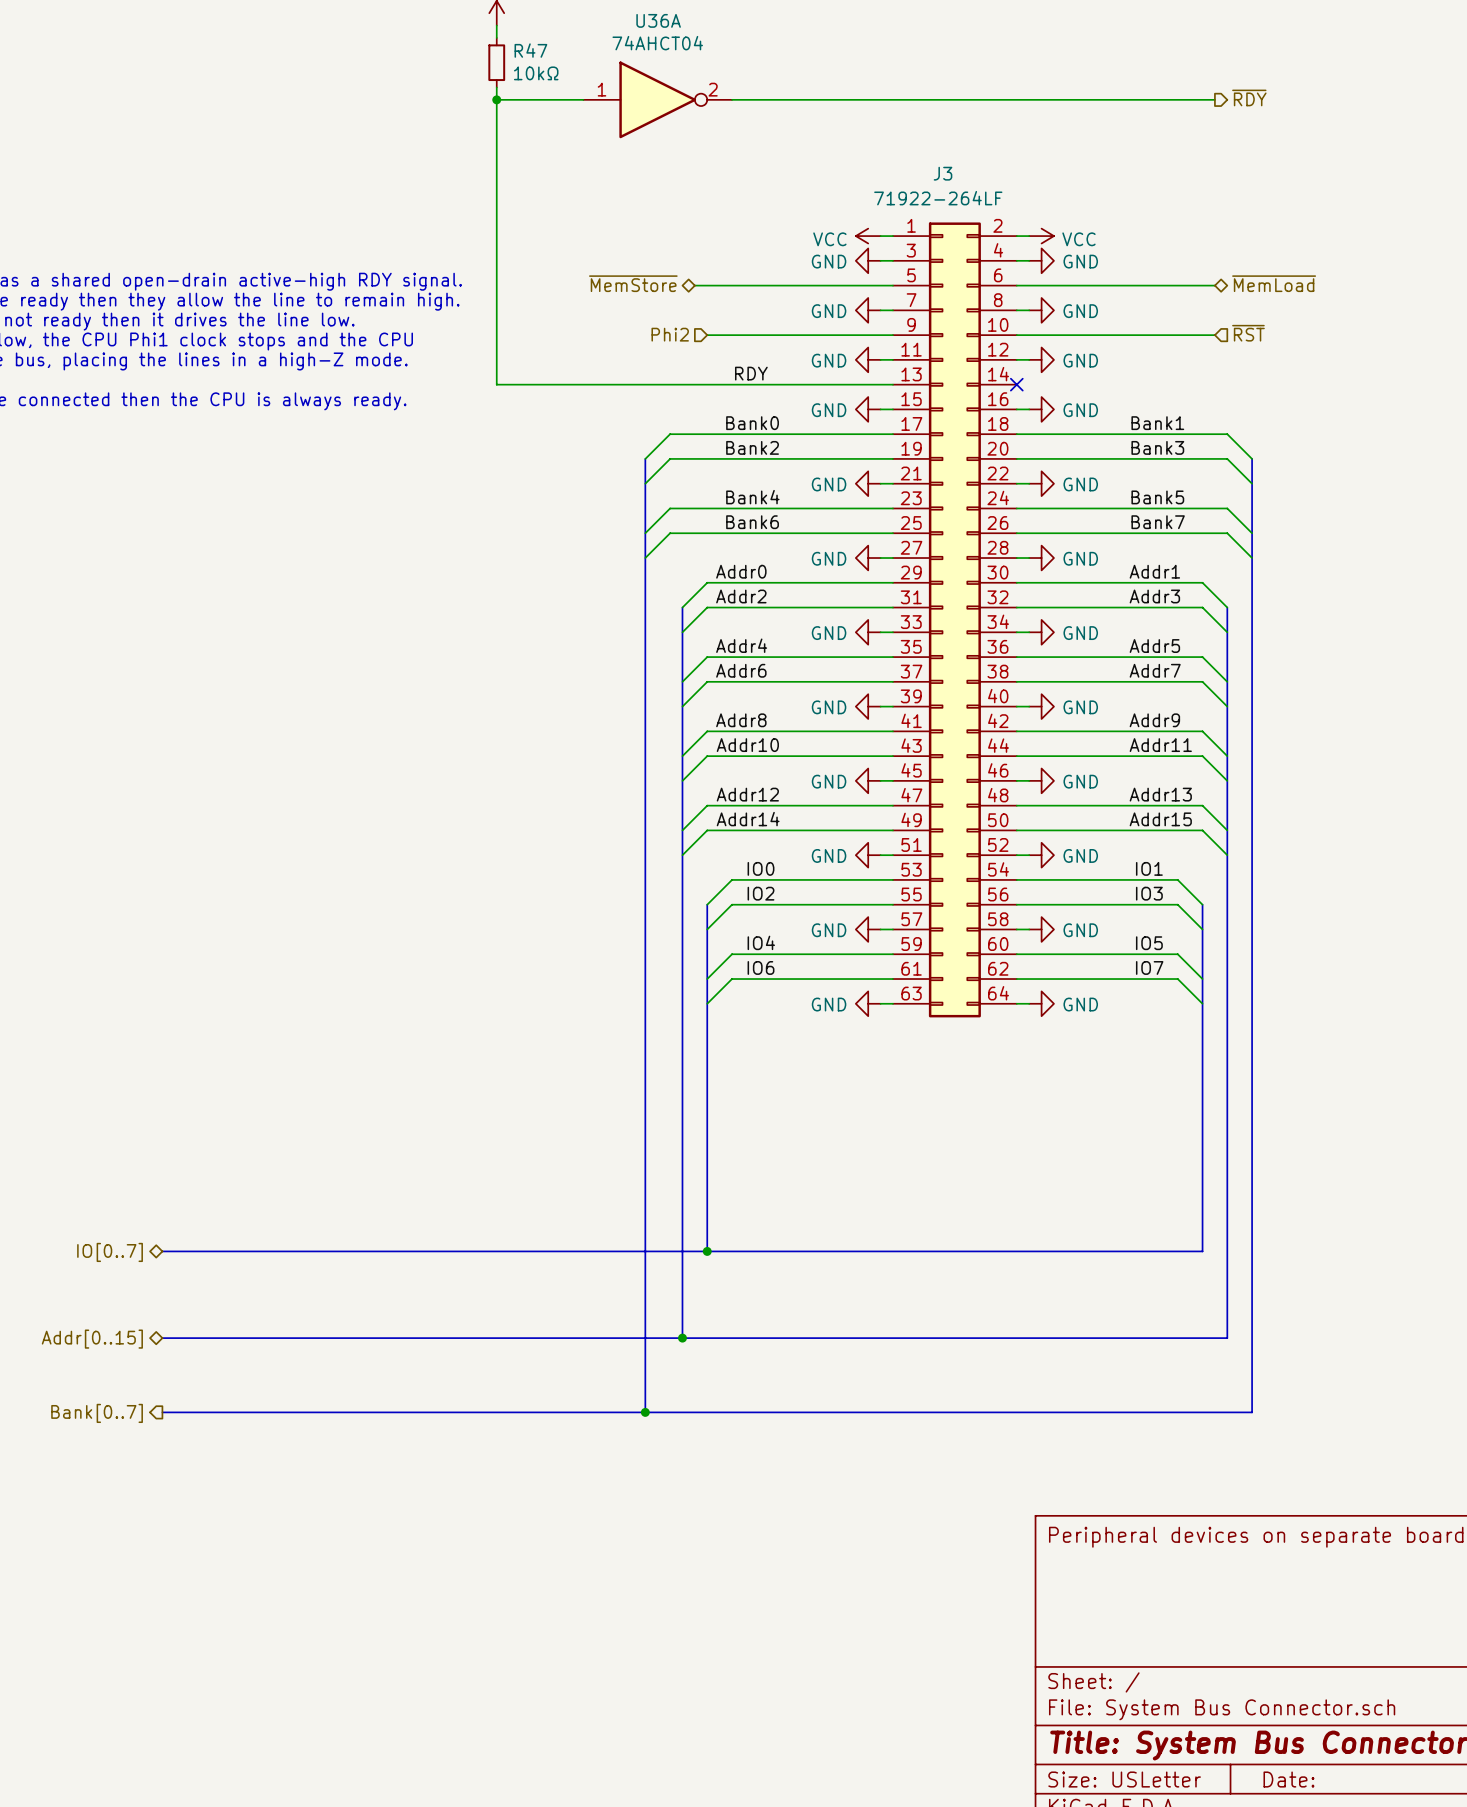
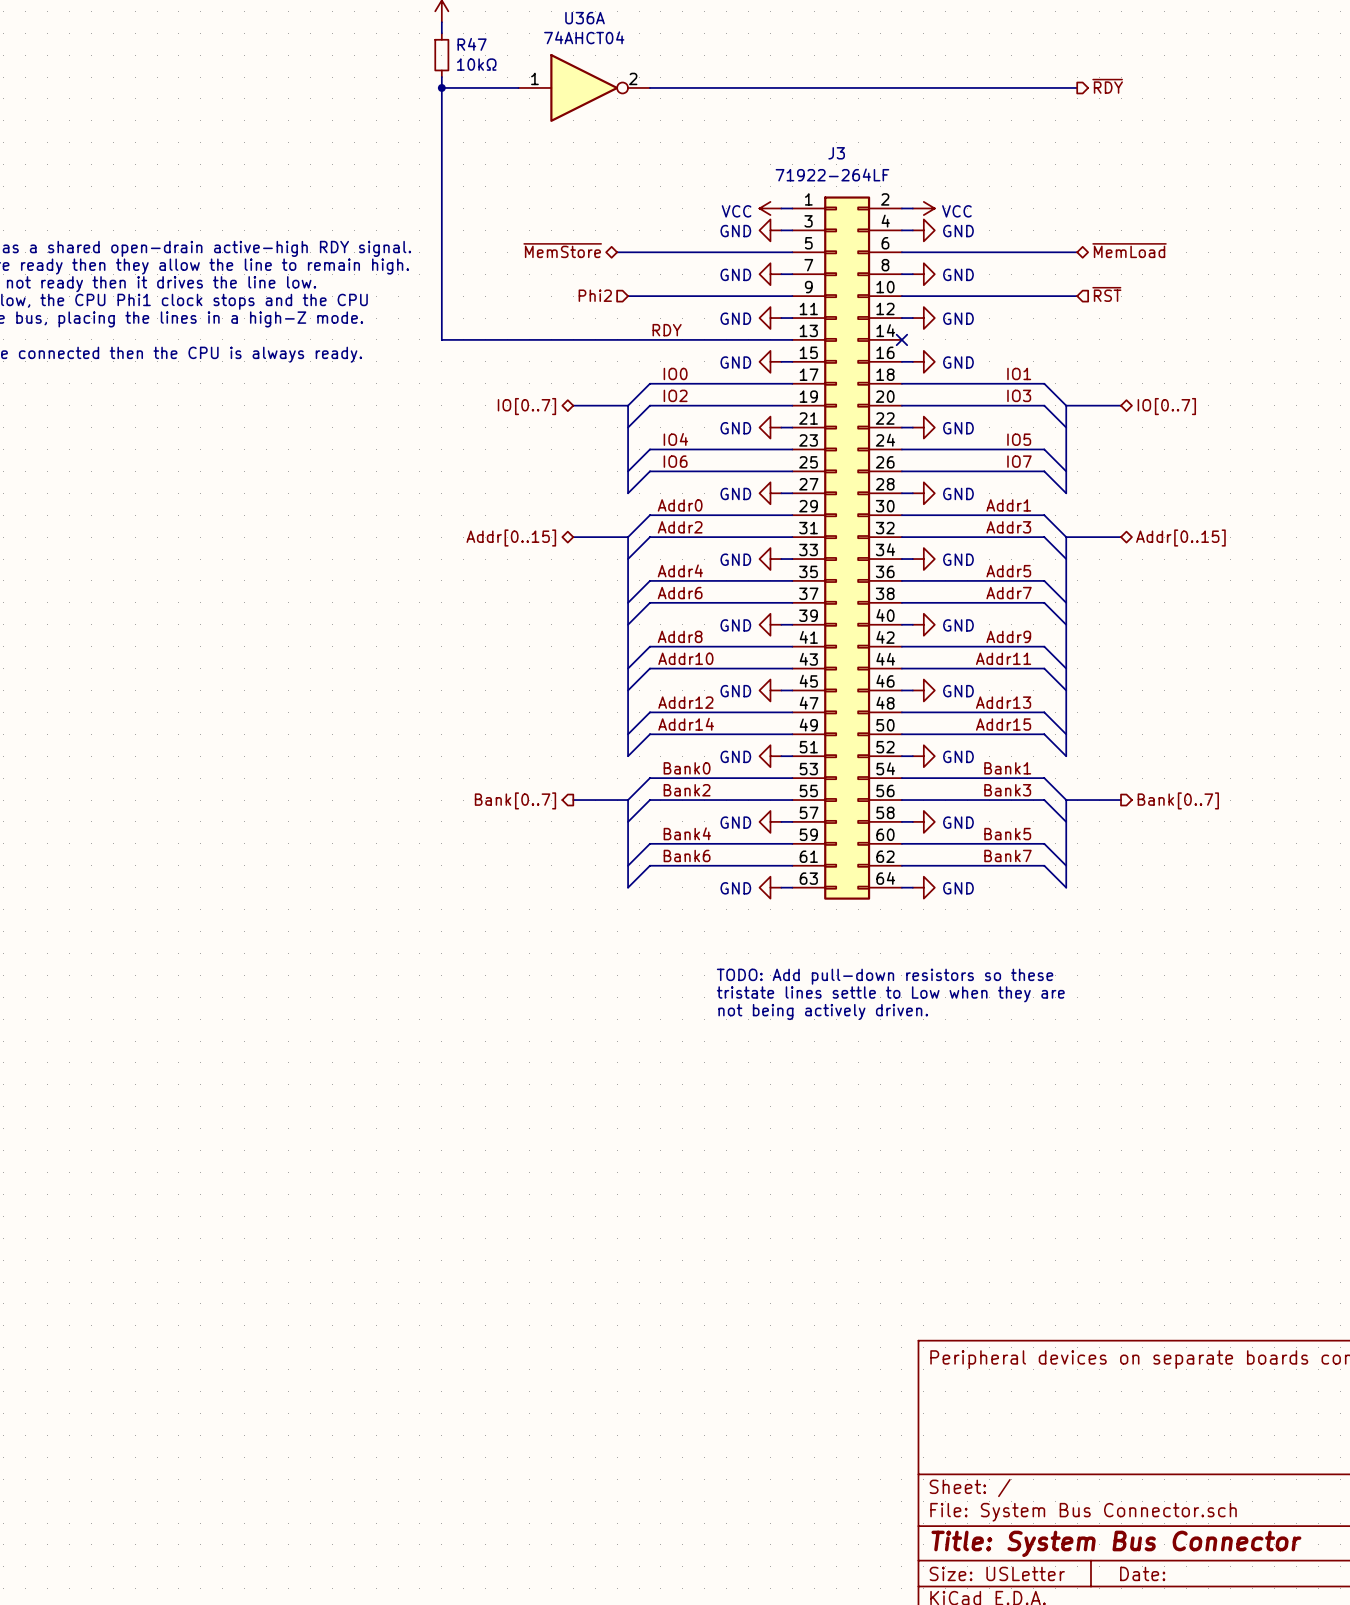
label: Bank0 (752, 423) -> none
label: none -> IO0 (675, 373)
label: none -> IO1 (1019, 373)
label: Bank1 (1157, 423) -> none
wire: (732, 434) (670, 434) (645, 458) -> (649, 383) (628, 405)
wire: (1177, 434) (1227, 434) (1252, 458) -> (1044, 383) (1066, 405)
label: Bank2 (752, 447) -> none
label: none -> IO2 (675, 395)
label: none -> IO3 (1019, 395)
label: Bank3 (1157, 447) -> none
bus: (645, 458) (645, 1412) -> (573, 405) (628, 405) (628, 493)
wire: (732, 458) (670, 458) (645, 483) -> (649, 405) (628, 427)
wire: (1177, 458) (1227, 458) (1252, 483) -> (1044, 405) (1066, 427)
bus: (1252, 458) (1252, 1412) (162, 1412) -> none
bus: none -> (1121, 405) (1066, 405) (1066, 493)
hierarchical label: none -> IO[0..7] (526, 406)
hierarchical label: none -> IO[0..7] (1166, 406)
label: Bank4 (752, 497) -> none
label: none -> IO4 (675, 439)
label: none -> IO5 (1019, 439)
label: Bank5 (1157, 497) -> none
wire: (732, 508) (670, 508) (645, 533) -> (649, 449) (628, 471)
wire: (1177, 508) (1227, 508) (1252, 533) -> (1044, 449) (1066, 471)
label: Bank6 (752, 522) -> none
label: none -> IO6 (675, 461)
label: none -> IO7 (1019, 461)
label: Bank7 (1158, 522) -> none
wire: (732, 533) (670, 533) (645, 558) -> (649, 471) (628, 493)
wire: (1177, 533) (1227, 533) (1252, 558) -> (1044, 471) (1066, 493)
label position: Addr0 (741, 571) -> Addr0 (680, 505)
label position: Addr1 (1154, 571) -> Addr1 (1008, 505)
wire: (732, 582) (707, 582) (682, 607) -> (649, 515) (628, 537)
wire: (1177, 582) (1202, 582) (1227, 607) -> (1044, 515) (1066, 537)
label position: Addr2 (741, 596) -> Addr2 (680, 527)
label position: Addr3 (1154, 596) -> Addr3 (1008, 527)
bus: none -> (573, 537) (628, 537) (628, 756)
bus: (682, 607) (682, 1338) -> none
wire: (732, 607) (707, 607) (682, 632) -> (649, 537) (628, 559)
wire: (1177, 607) (1202, 607) (1227, 632) -> (1044, 537) (1066, 559)
bus: (1227, 607) (1227, 1338) (162, 1338) -> none
bus: none -> (1121, 537) (1066, 537) (1066, 756)
hierarchical label: none -> Addr[0..15] (511, 538)
hierarchical label: none -> Addr[0..15] (1180, 538)
label position: Addr4 (741, 645) -> Addr4 (680, 570)
label position: Addr5 (1154, 646) -> Addr5 (1008, 571)
wire: (732, 657) (707, 657) (682, 681) -> (649, 580) (628, 602)
wire: (1177, 657) (1202, 657) (1227, 681) -> (1044, 580) (1066, 602)
label position: Addr6 (741, 670) -> Addr6 (680, 593)
label position: Addr7 (1155, 670) -> Addr7 (1009, 593)
wire: (732, 681) (707, 681) (682, 706) -> (649, 602) (628, 624)
wire: (1177, 681) (1202, 681) (1227, 706) -> (1044, 602) (1066, 624)
label position: Addr8 (741, 720) -> Addr8 (680, 636)
label position: Addr9 (1154, 720) -> Addr9 (1008, 636)
wire: (732, 731) (707, 731) (682, 756) -> (649, 646) (628, 668)
wire: (1177, 731) (1202, 731) (1227, 756) -> (1044, 646) (1066, 668)
label position: Addr10 (747, 745) -> Addr10 (685, 658)
label position: Addr11 (1160, 745) -> Addr11 (1003, 658)
wire: (732, 756) (707, 756) (682, 780) -> (649, 668) (628, 690)
wire: (1177, 756) (1202, 756) (1227, 780) -> (1044, 668) (1066, 690)
label position: Addr12 (747, 794) -> Addr12 (685, 702)
label position: Addr13 (1160, 794) -> Addr13 (1003, 702)
wire: (732, 805) (707, 805) (682, 830) -> (649, 712) (628, 734)
wire: (1177, 805) (1202, 805) (1227, 830) -> (1044, 712) (1066, 734)
label position: Addr14 (748, 819) -> Addr14 (686, 724)
label position: Addr15 (1160, 819) -> Addr15 (1003, 724)
wire: (732, 830) (707, 830) (682, 855) -> (649, 734) (628, 756)
wire: (1177, 830) (1202, 830) (1227, 855) -> (1044, 734) (1066, 756)
label: IO0 (761, 868) -> Bank0 (687, 768)
label: IO1 (1149, 868) -> Bank1 (1007, 768)
label: IO2 (761, 893) -> Bank2 (687, 790)
label: IO3 (1149, 893) -> Bank3 (1007, 790)
bus: none -> (573, 800) (628, 800)
bus: none -> (1066, 800) (1121, 800)
hierarchical label: none -> Bank[0..7] (515, 800)
hierarchical label: none -> Bank[0..7] (1178, 800)
label: IO4 (761, 942) -> Bank4 (687, 833)
label: IO5 (1149, 943) -> Bank5 (1007, 834)
label: IO6 (761, 967) -> Bank6 (687, 855)
label: IO7 (1149, 967) -> Bank7 (1007, 855)
bus: (707, 1003) (707, 1251) -> none
bus: (1202, 1003) (1202, 1251) (162, 1251) -> none
text: none -> TODO: Add pull-down resistors so these (885, 976)
text: none -> tristate lines settle to Low when they are (890, 994)
text: none -> not being actively driven. (823, 1011)
junction: (707, 1251) -> none
hierarchical label: IO[0..7] (110, 1252) -> none
junction: (682, 1338) -> none
hierarchical label: Addr[0..15] (92, 1339) -> none
junction: (645, 1412) -> none
hierarchical label: Bank[0..7] (97, 1413) -> none

